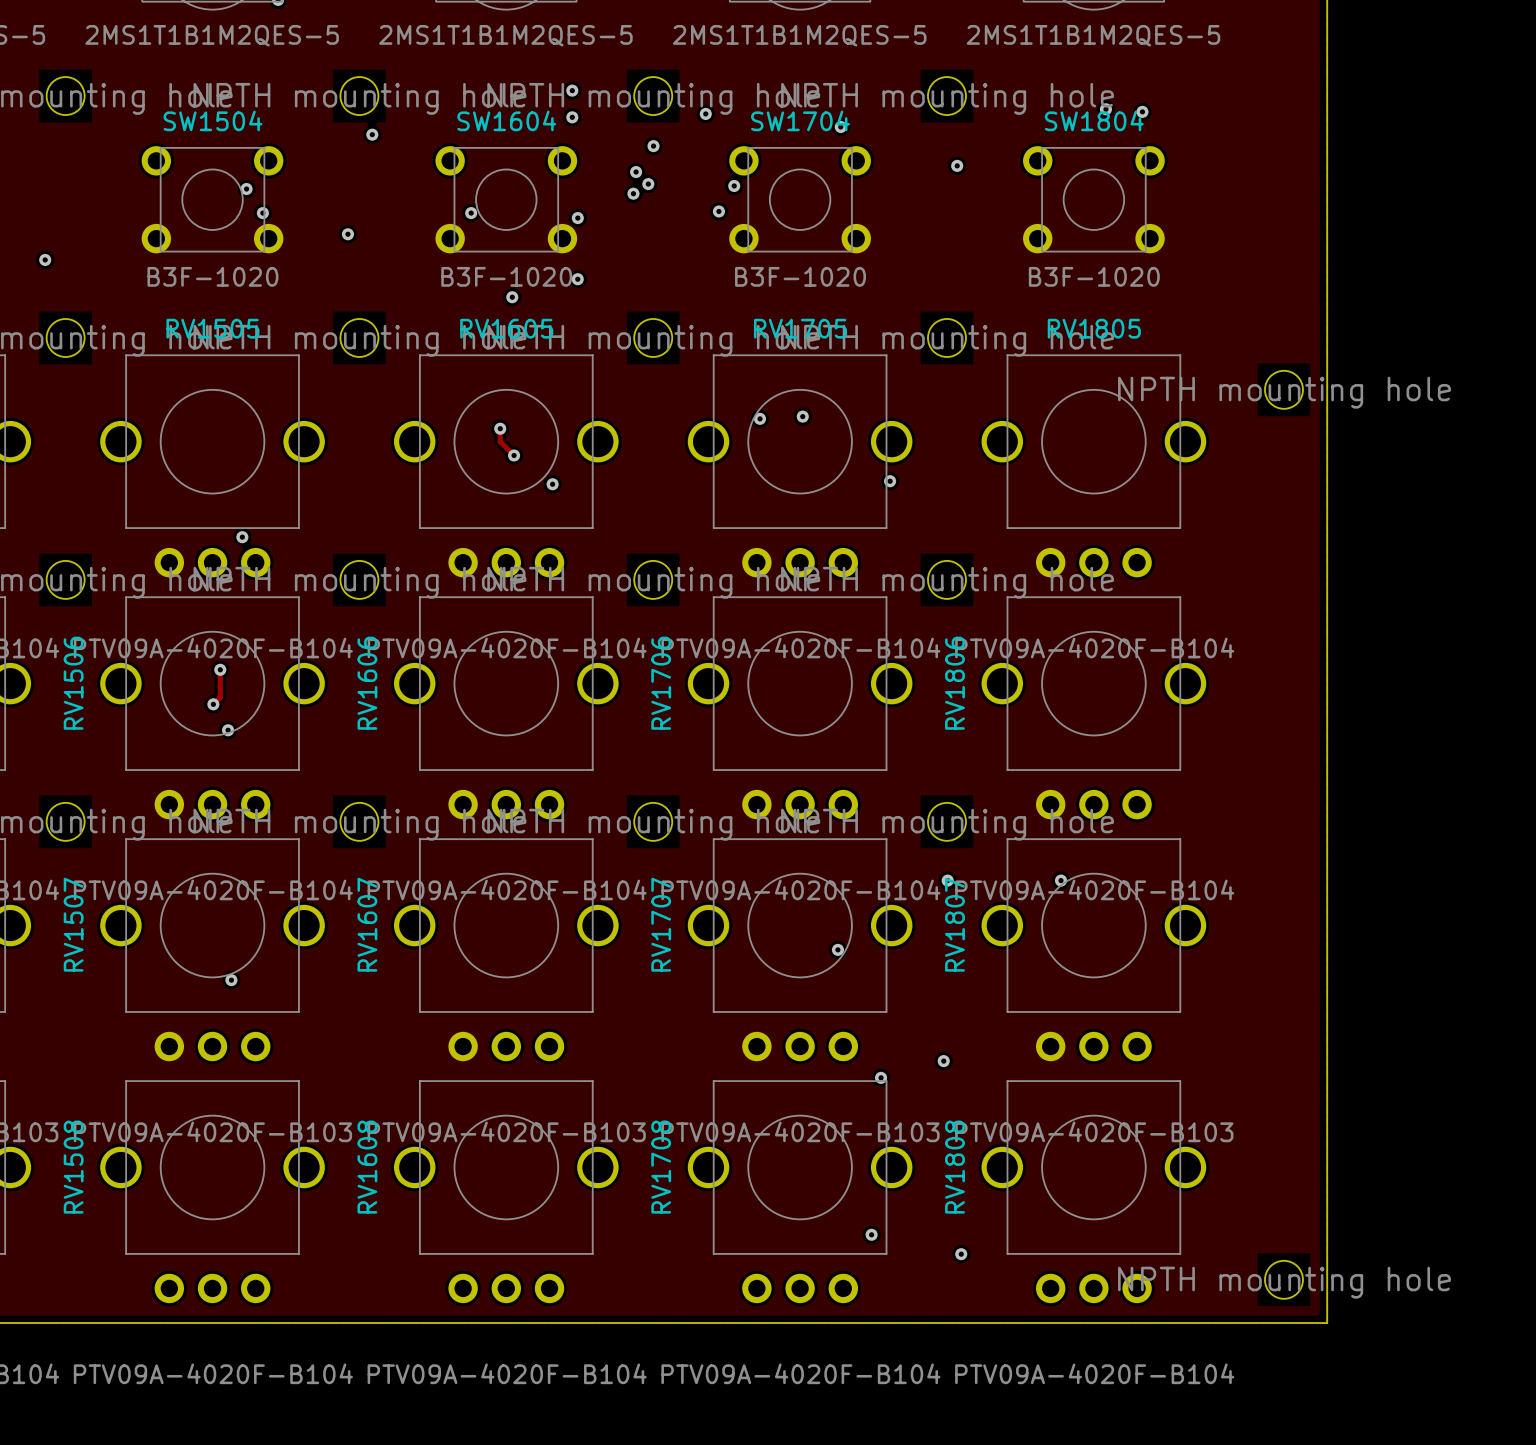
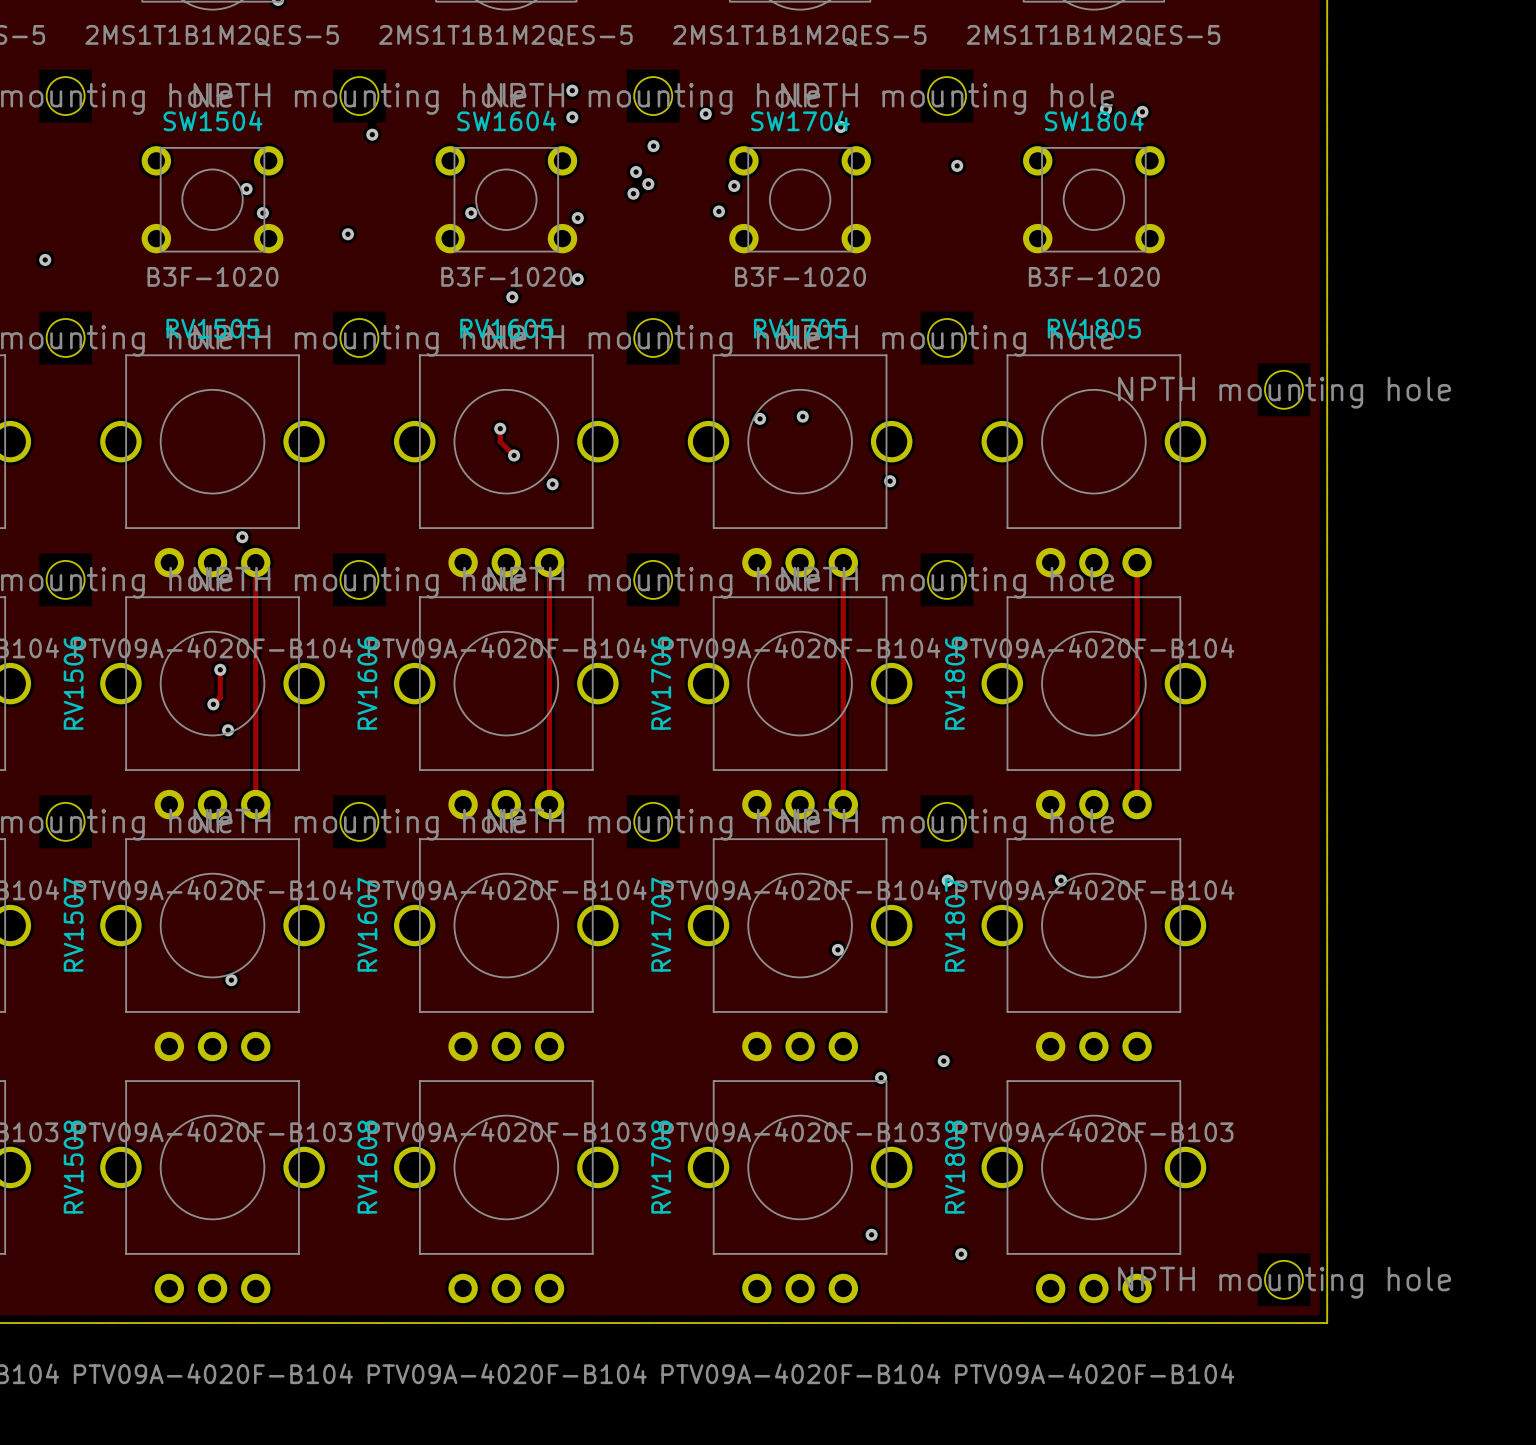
track: none -> (255, 562) (255, 804)
track: none -> (549, 562) (549, 804)
track: none -> (843, 562) (843, 804)
track: none -> (1137, 562) (1137, 804)

